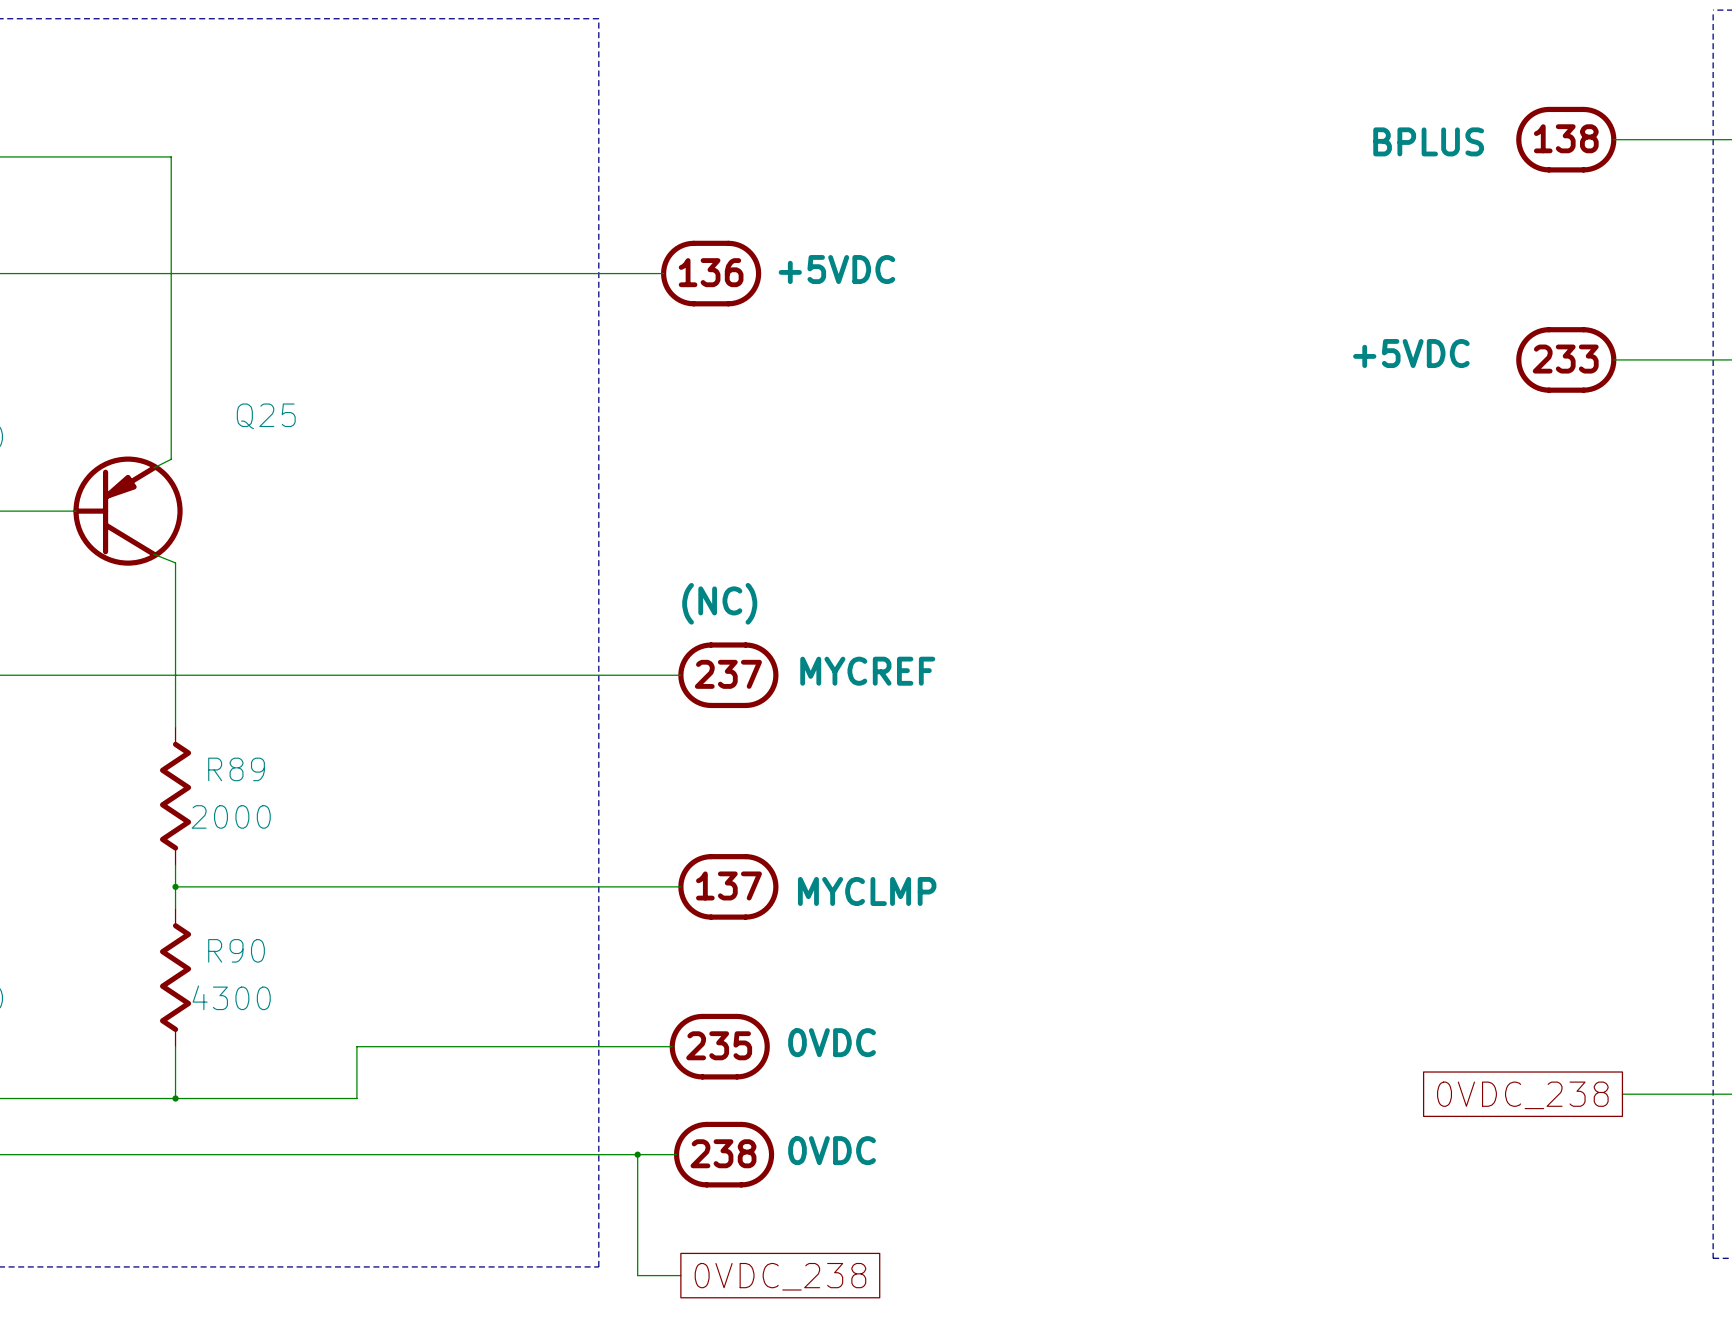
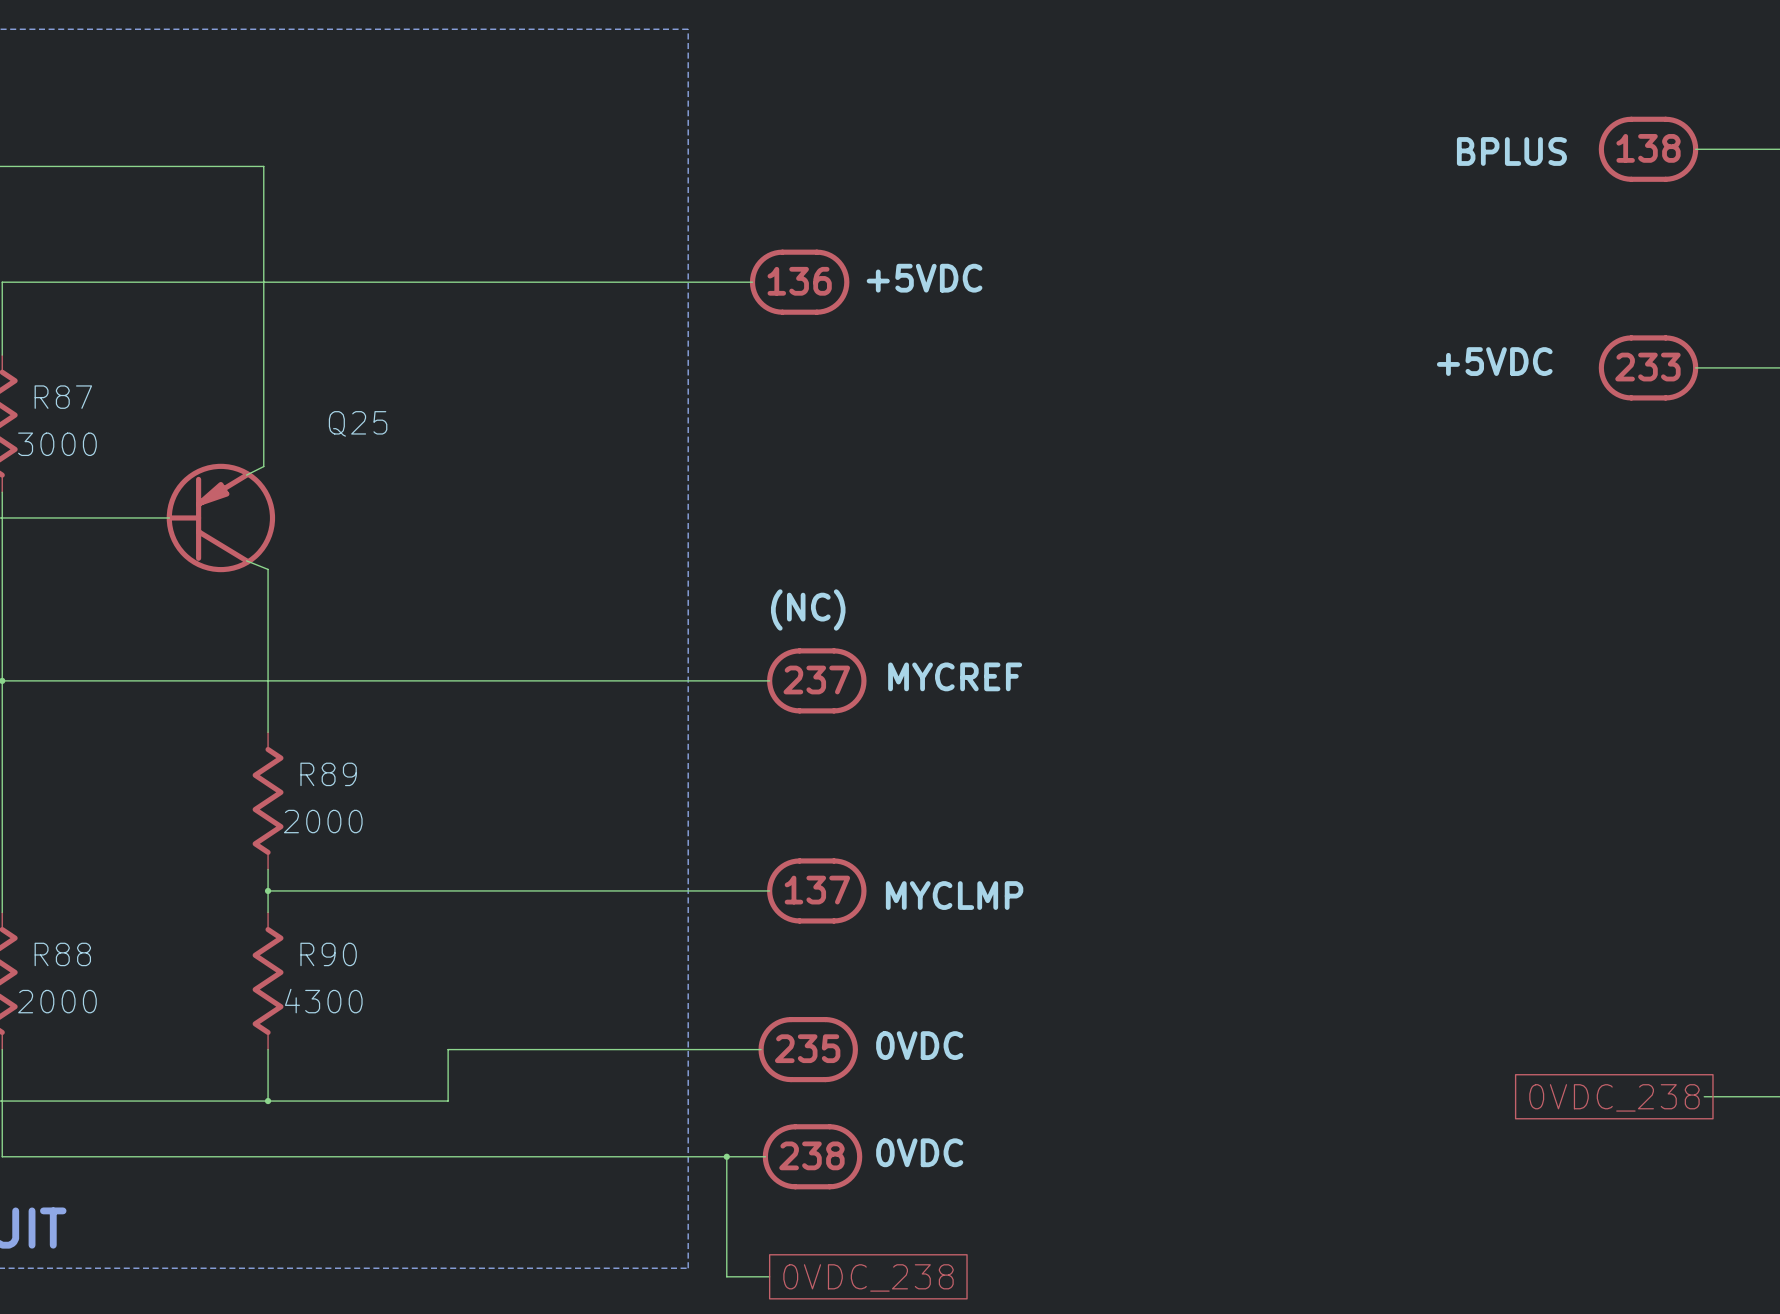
global label: 0VDC_238 (1522, 1095) -> none
global label: none -> 0VDC_238 (1614, 1097)

